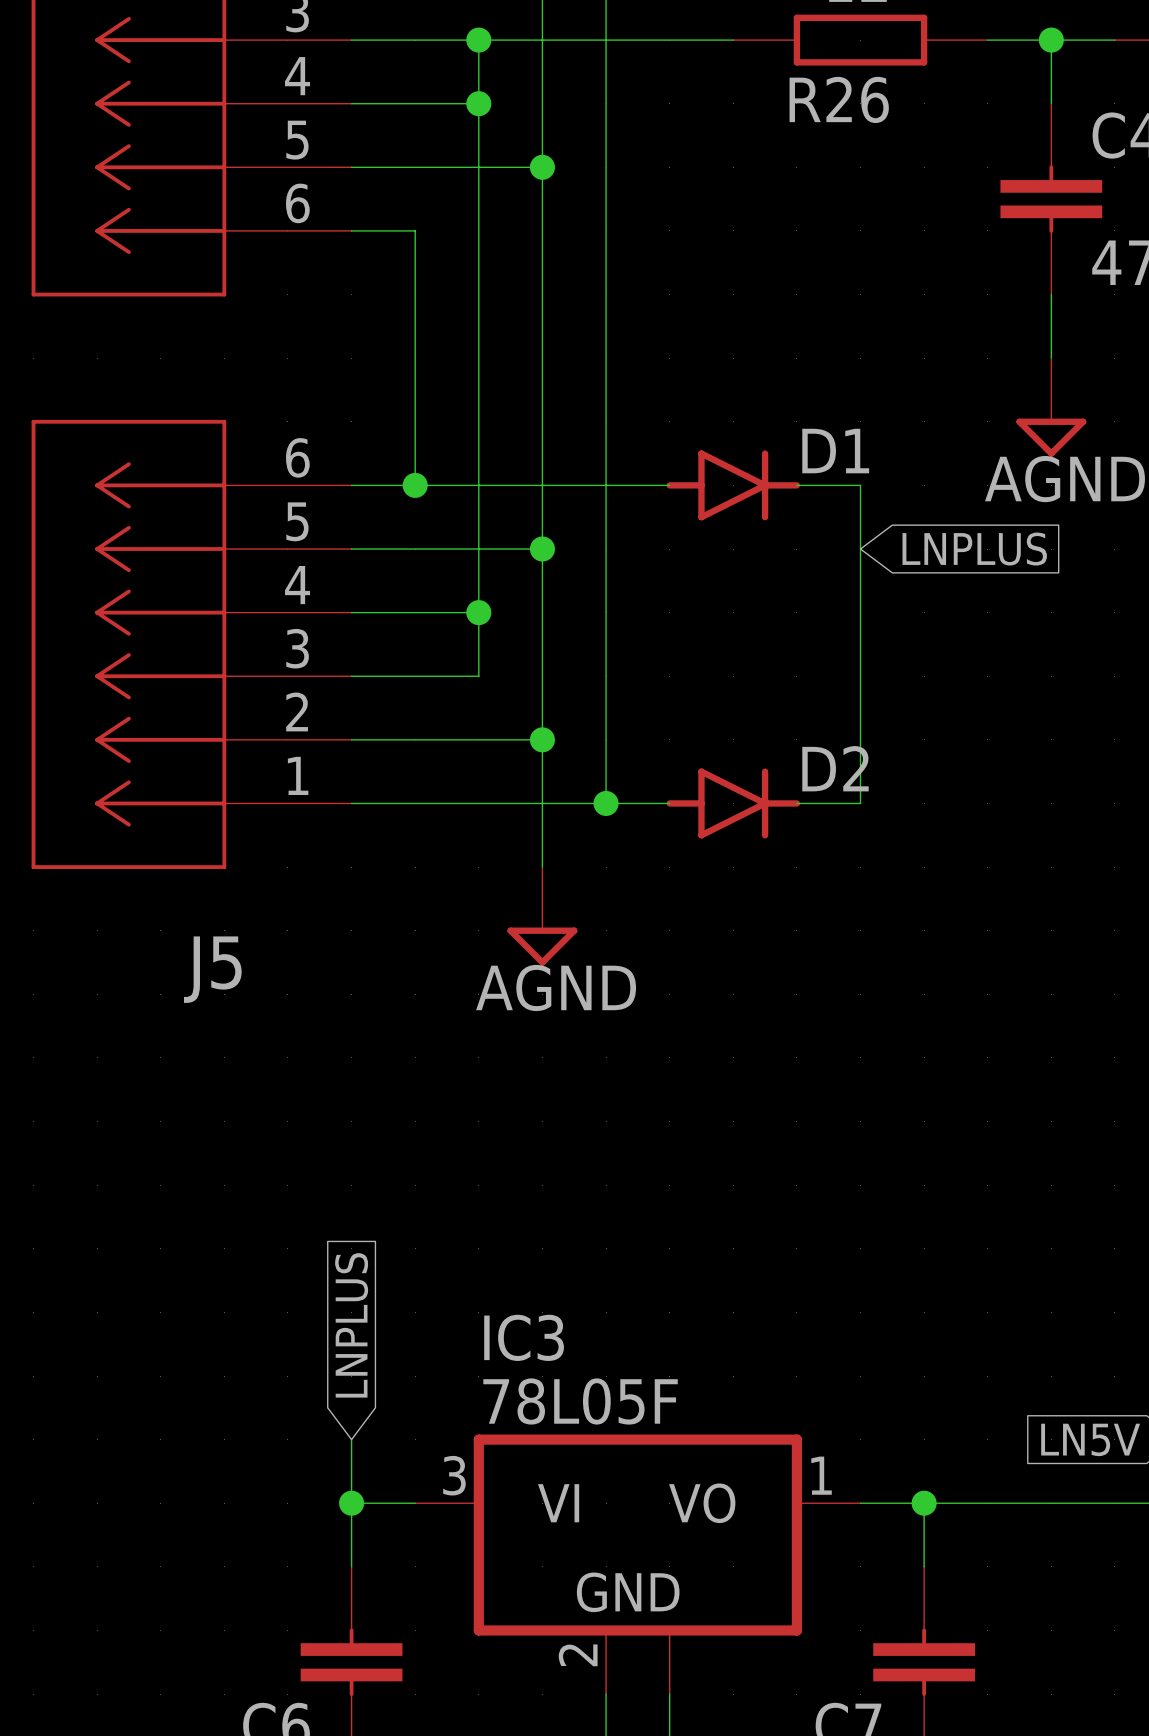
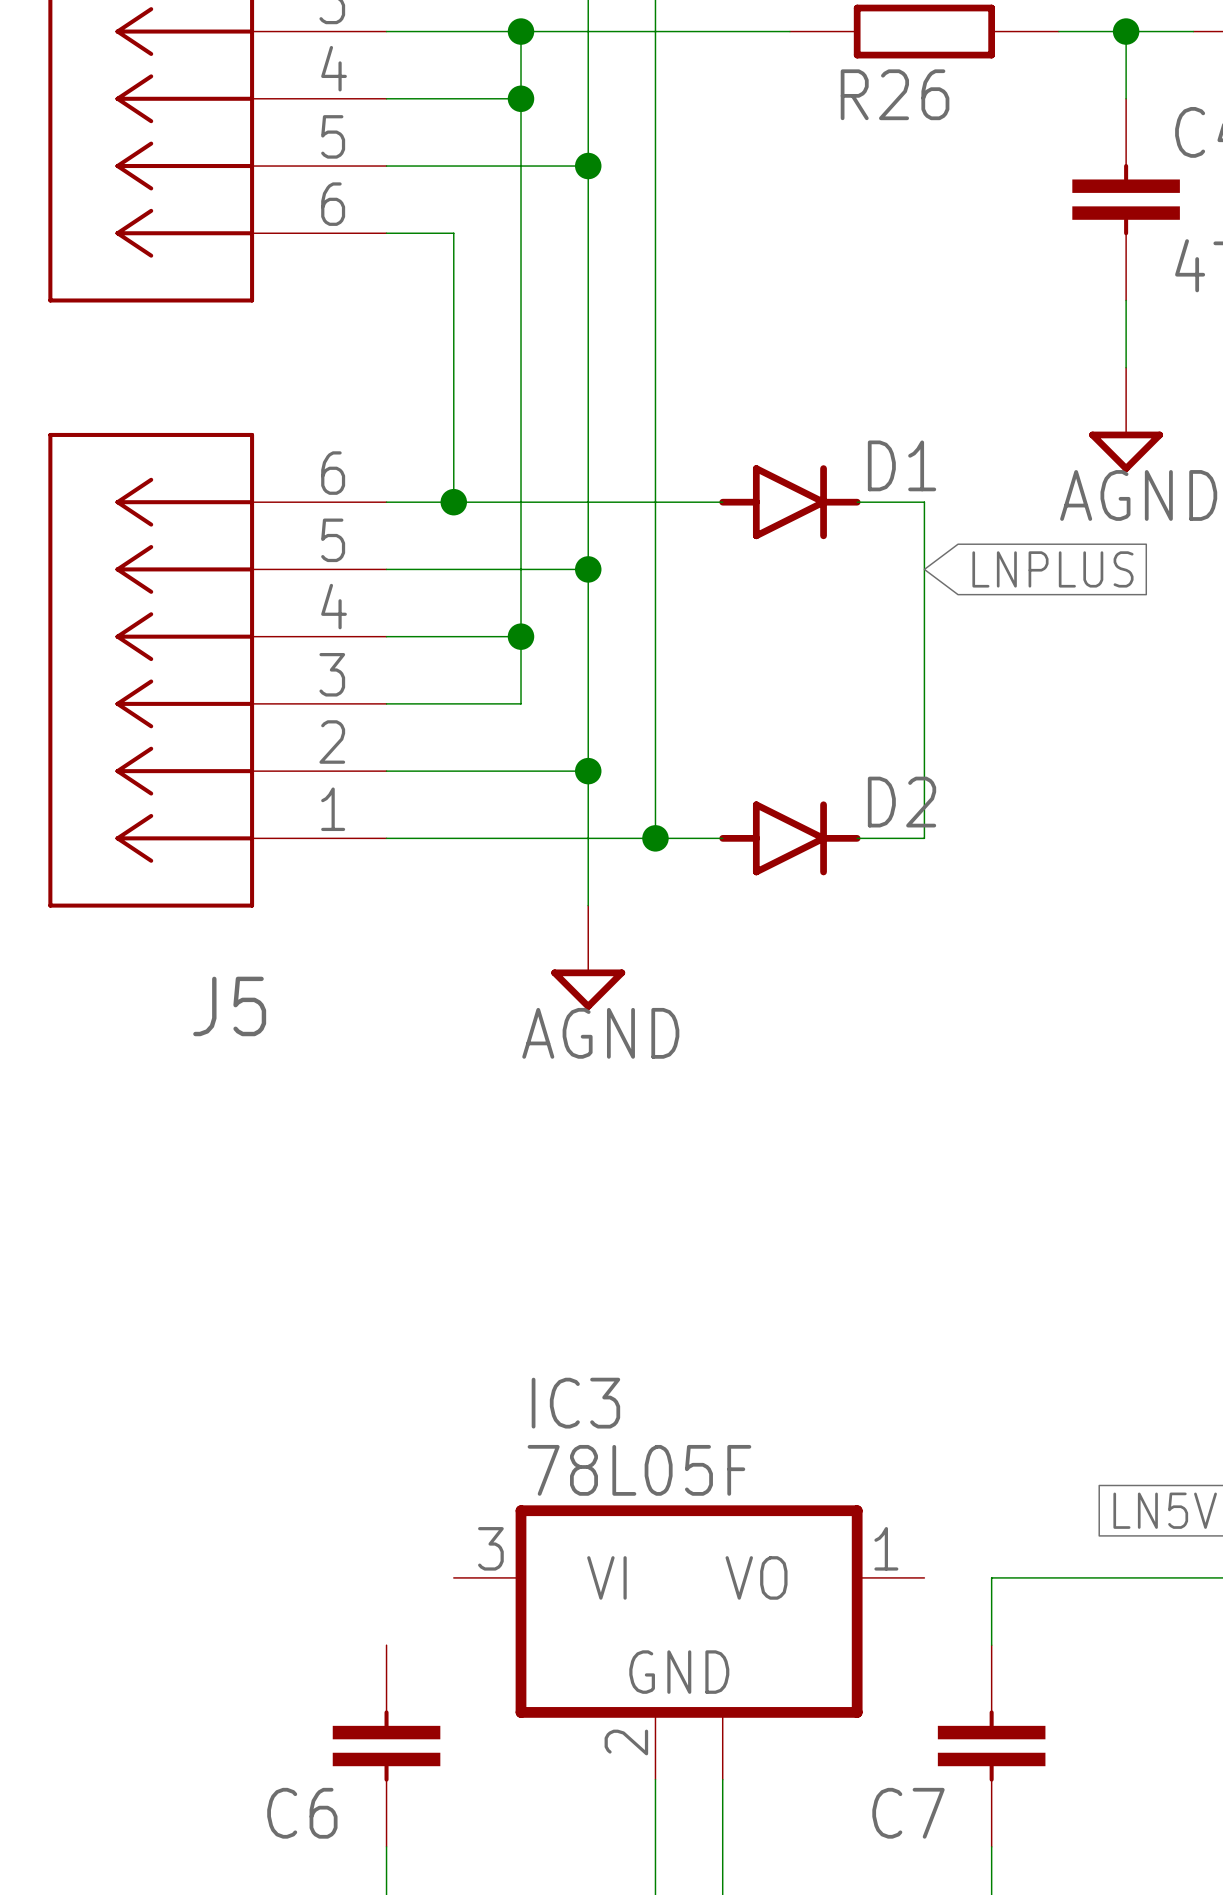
global label: LNPLUS (351, 1325) -> none
wire: (351, 1439) (351, 1566) -> none
wire: (351, 1503) (415, 1503) -> none
junction: (351, 1503) -> none
wire: (860, 1503) (924, 1503) -> none
junction: (924, 1503) -> none

